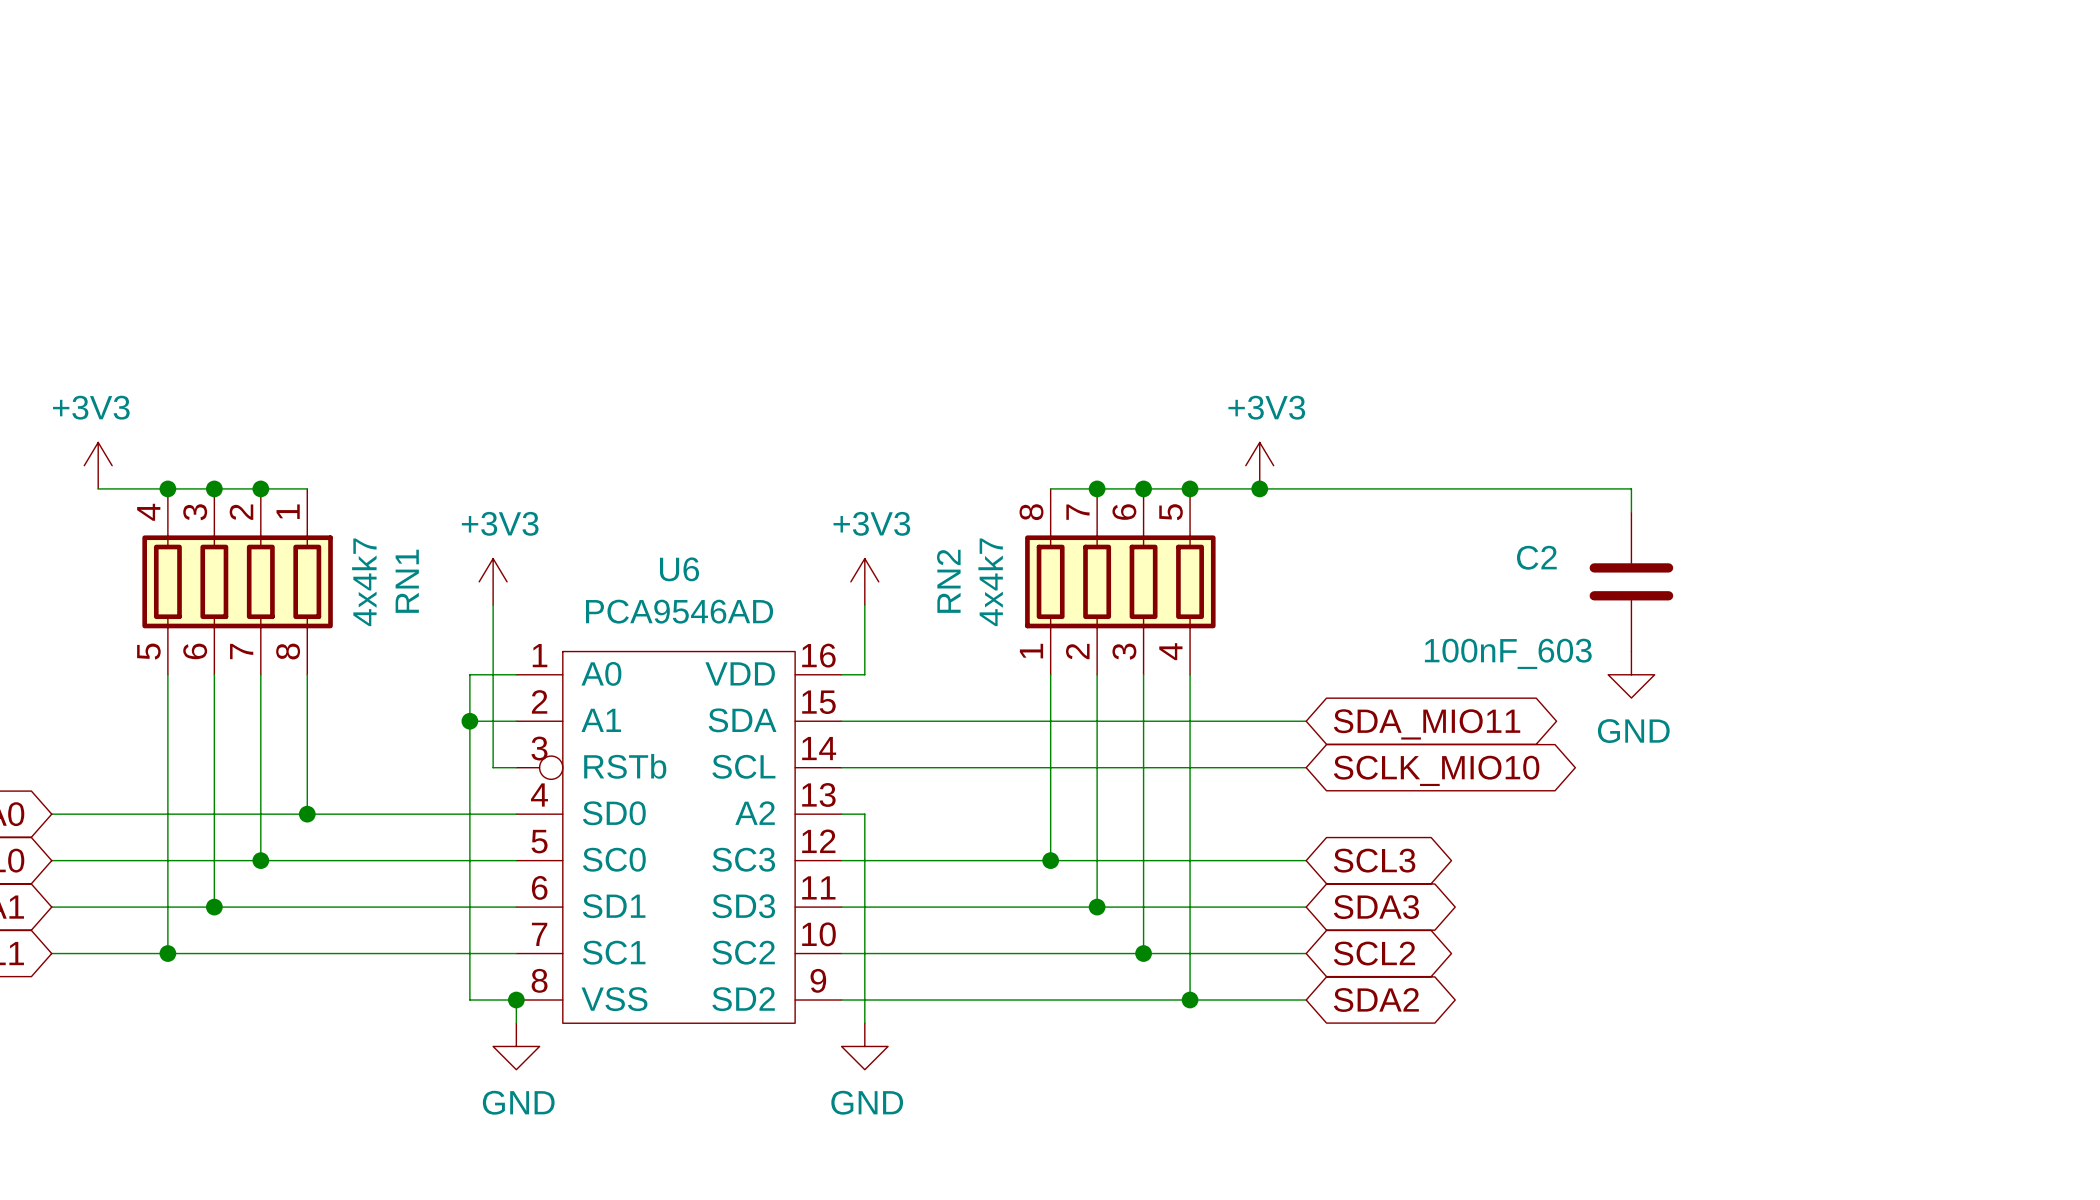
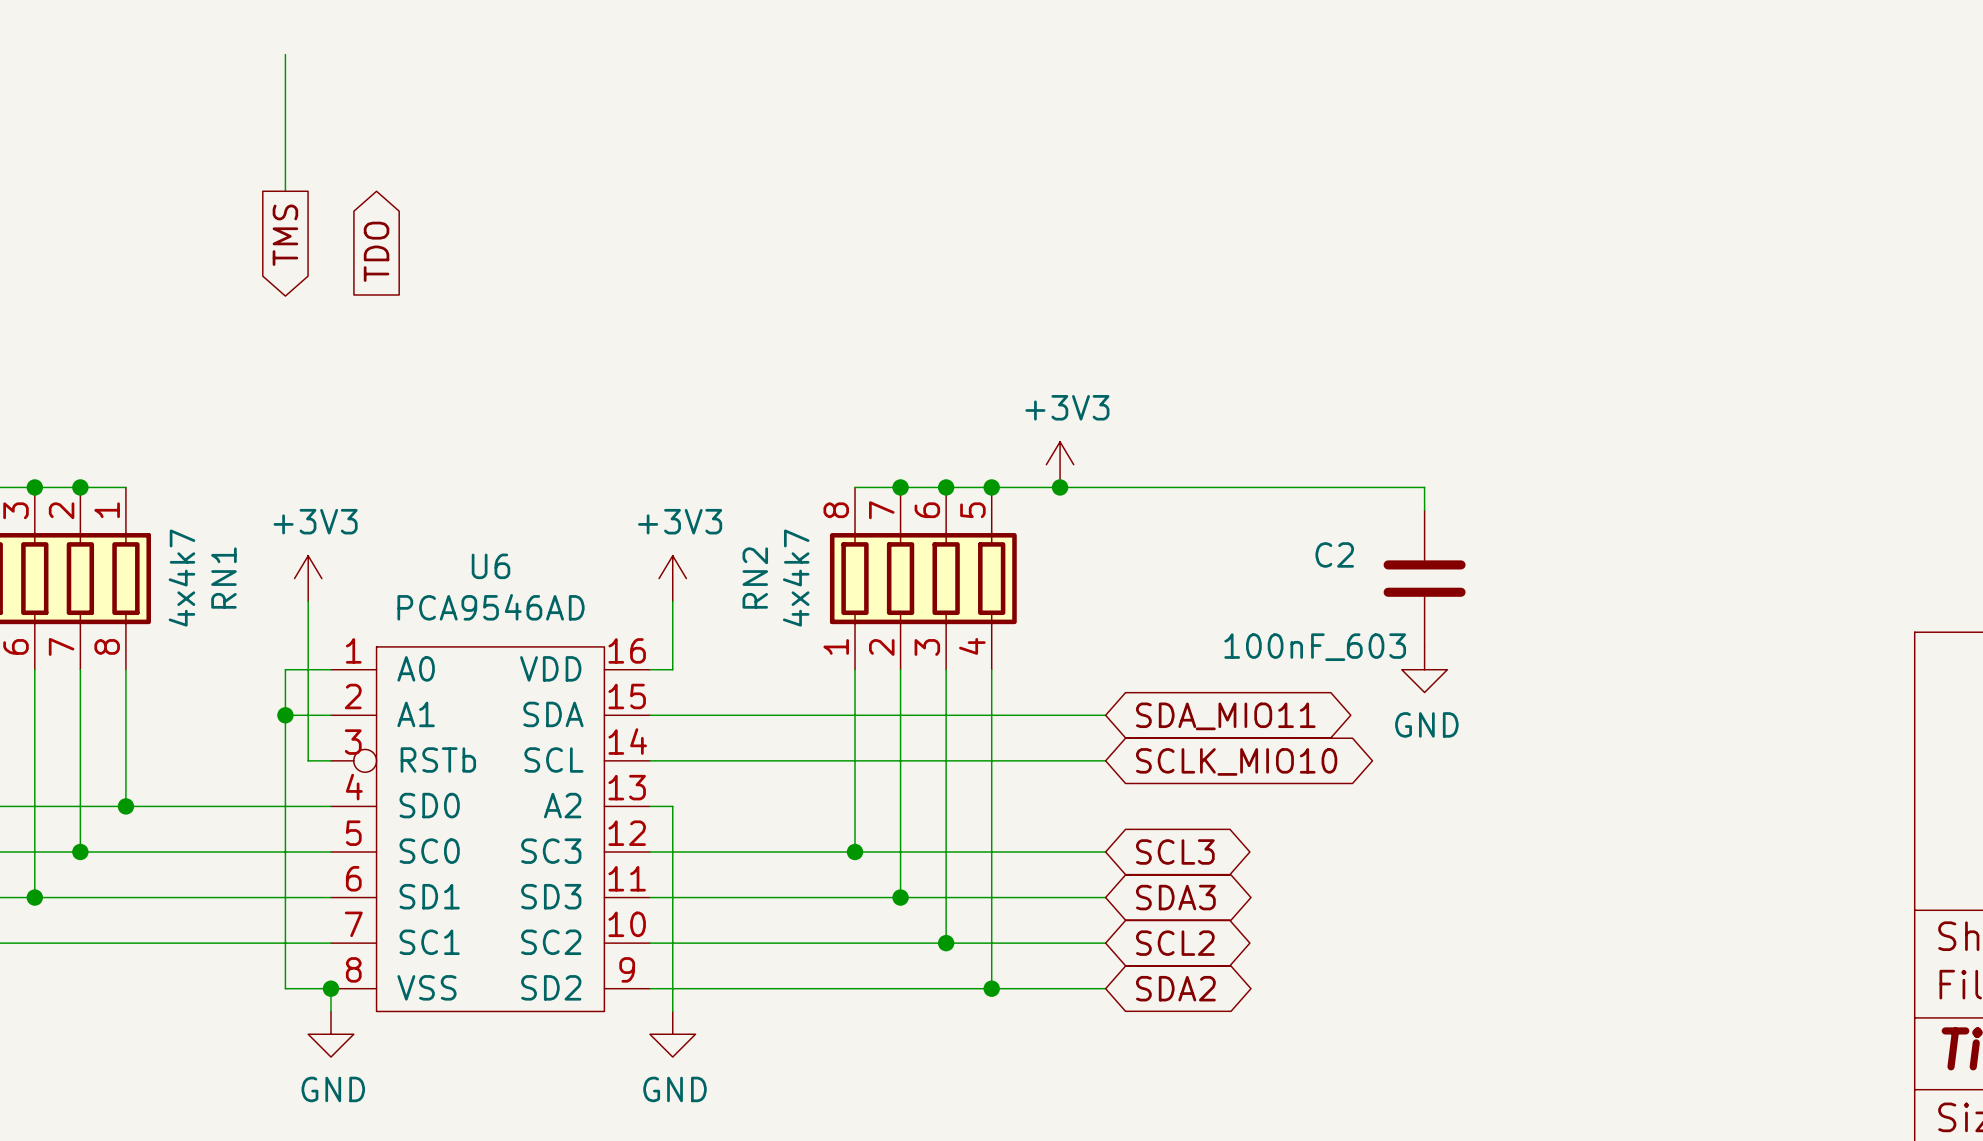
wire: none -> (285, 54) (285, 191)
global label: none -> TMS (285, 235)
global label: none -> TDO (376, 251)

